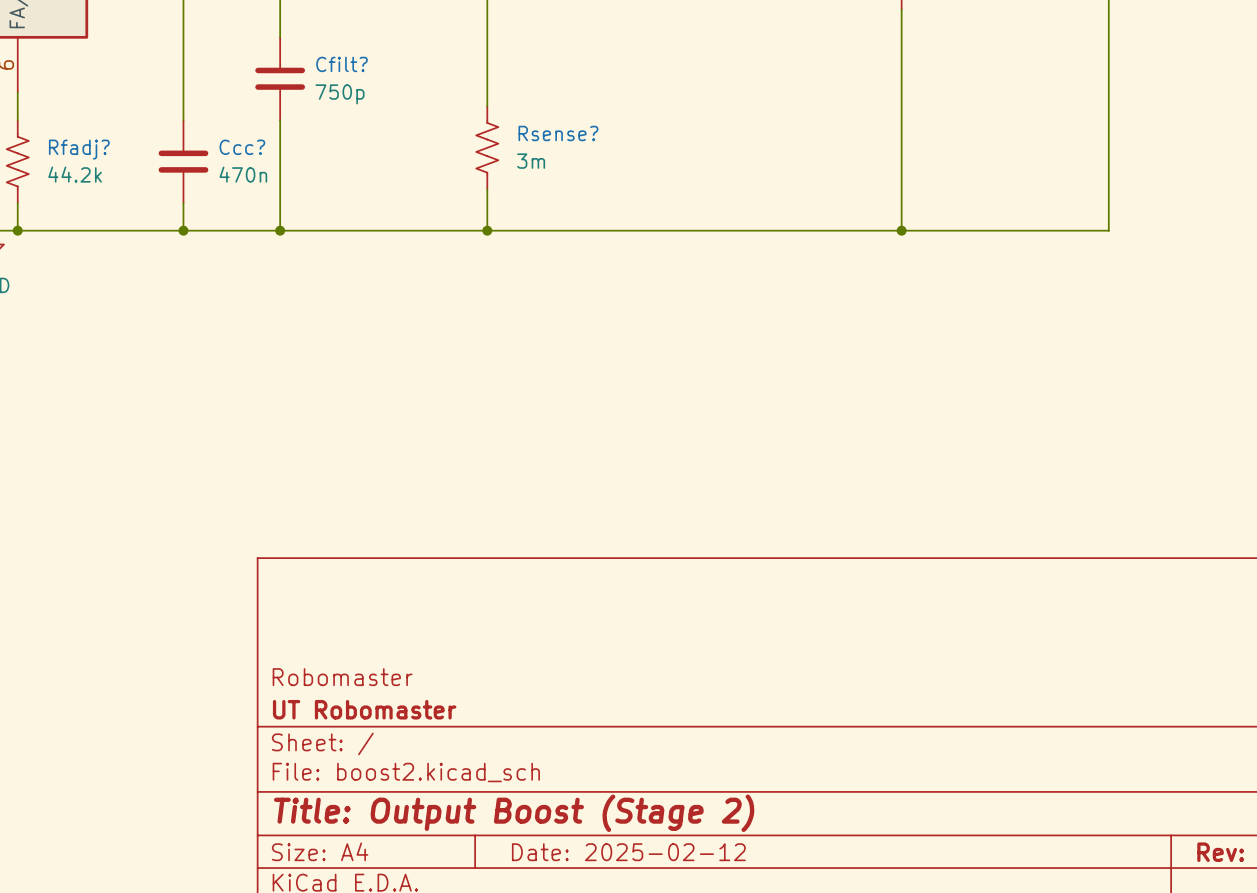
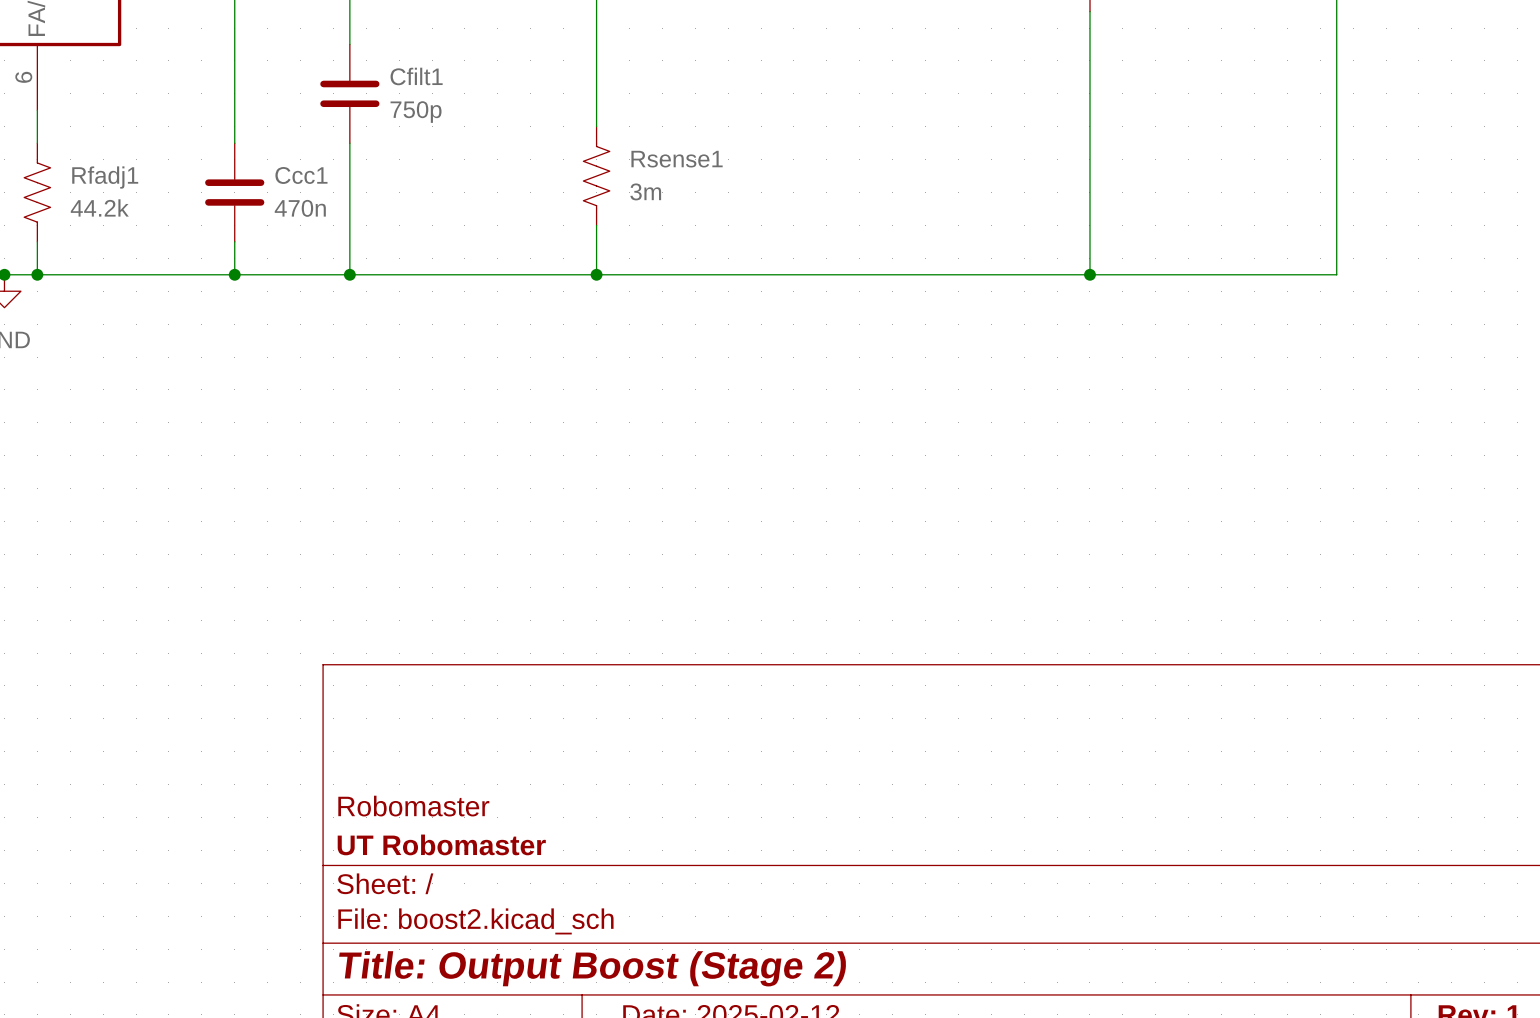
Cfilt? name: Cfilt? (342, 64) -> Cfilt1 (416, 76)
Rsense? name: Rsense? (558, 133) -> Rsense1 (677, 159)
Ccc? name: Ccc? (242, 147) -> Ccc1 (301, 175)
Rfadj? name: Rfadj? (79, 149) -> Rfadj1 (105, 177)

